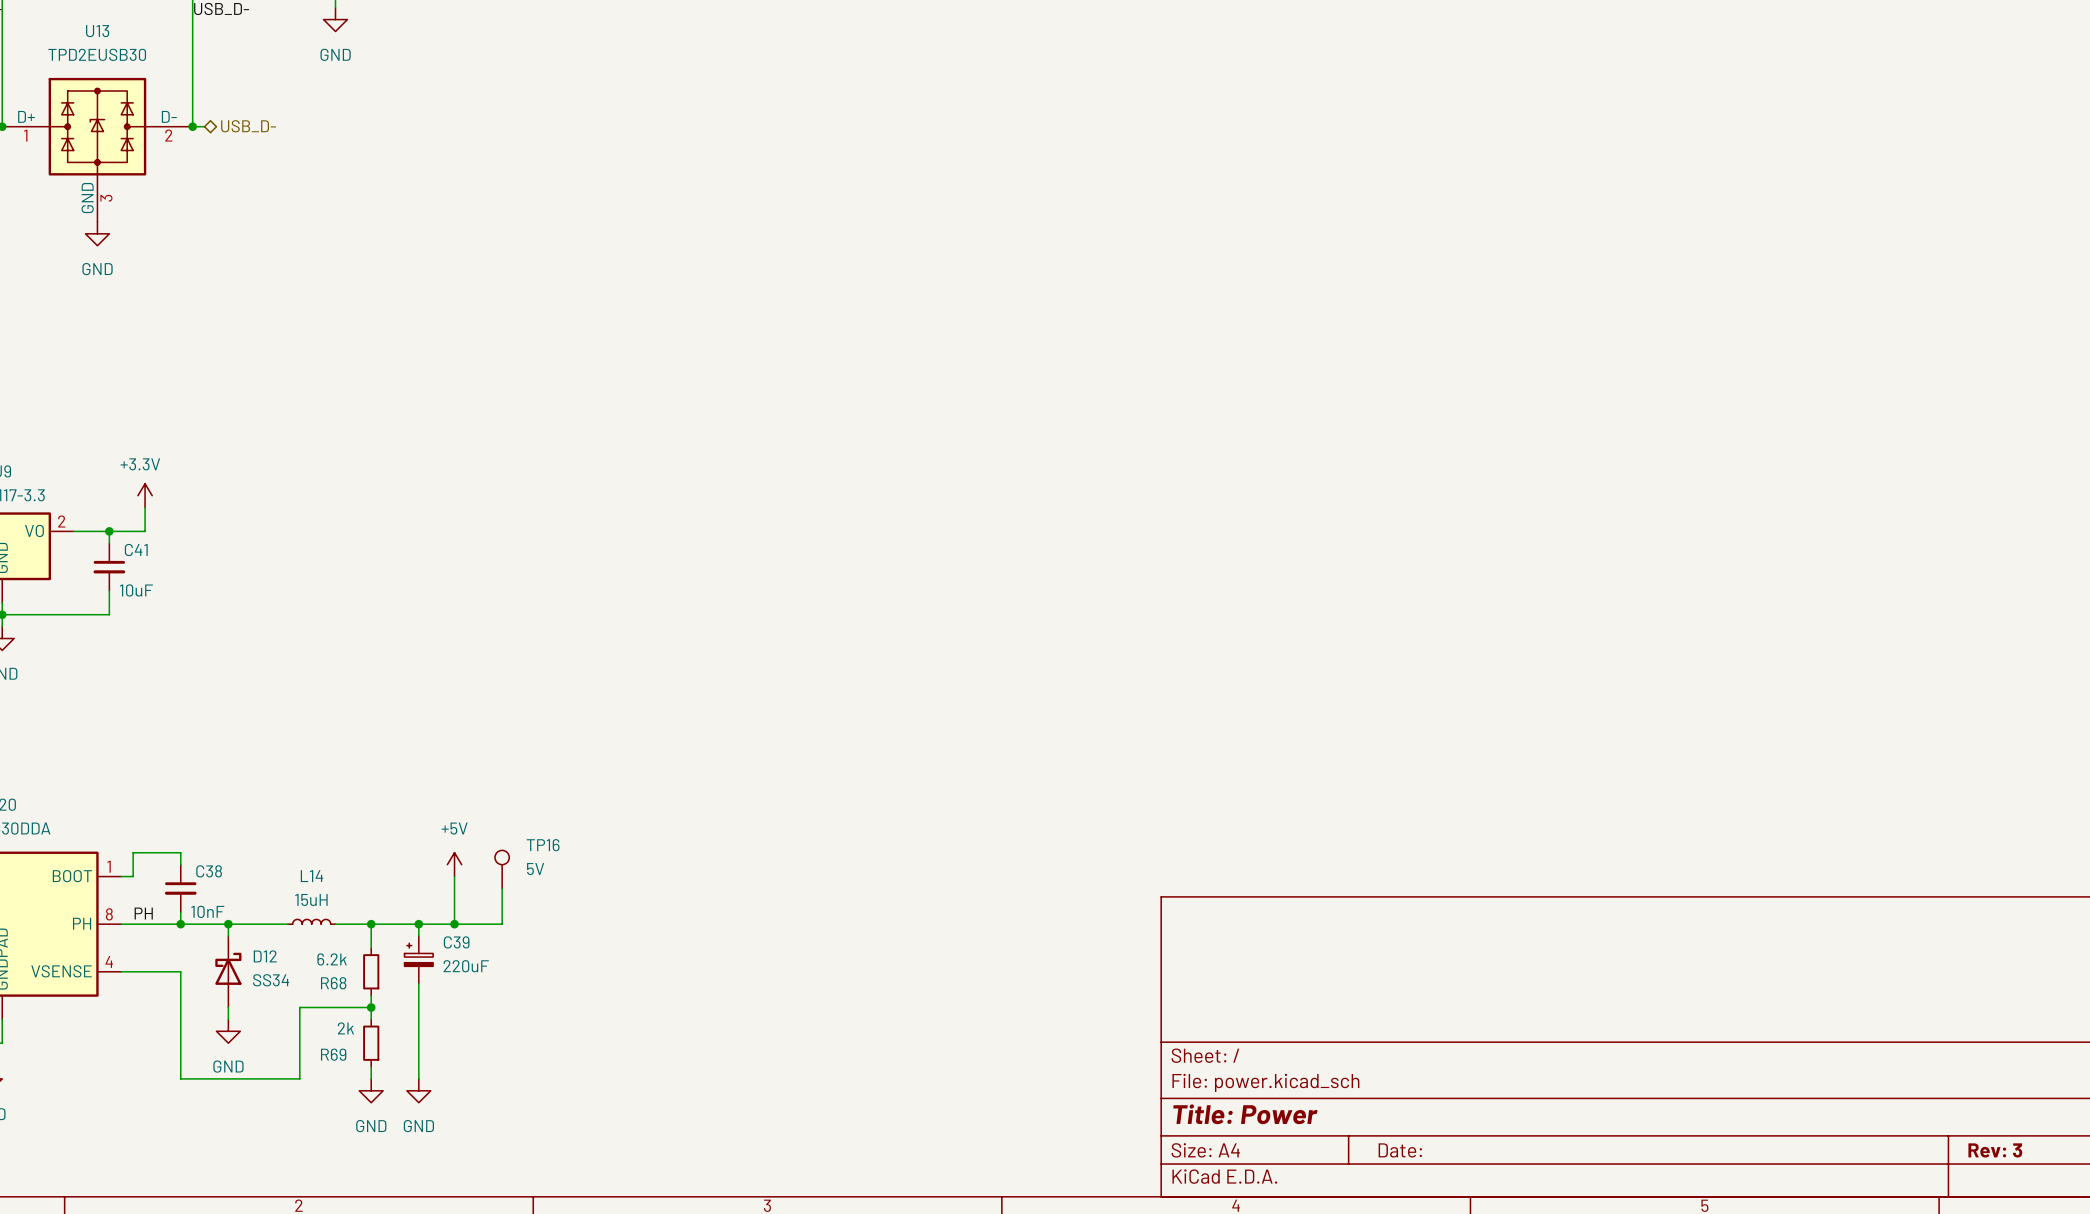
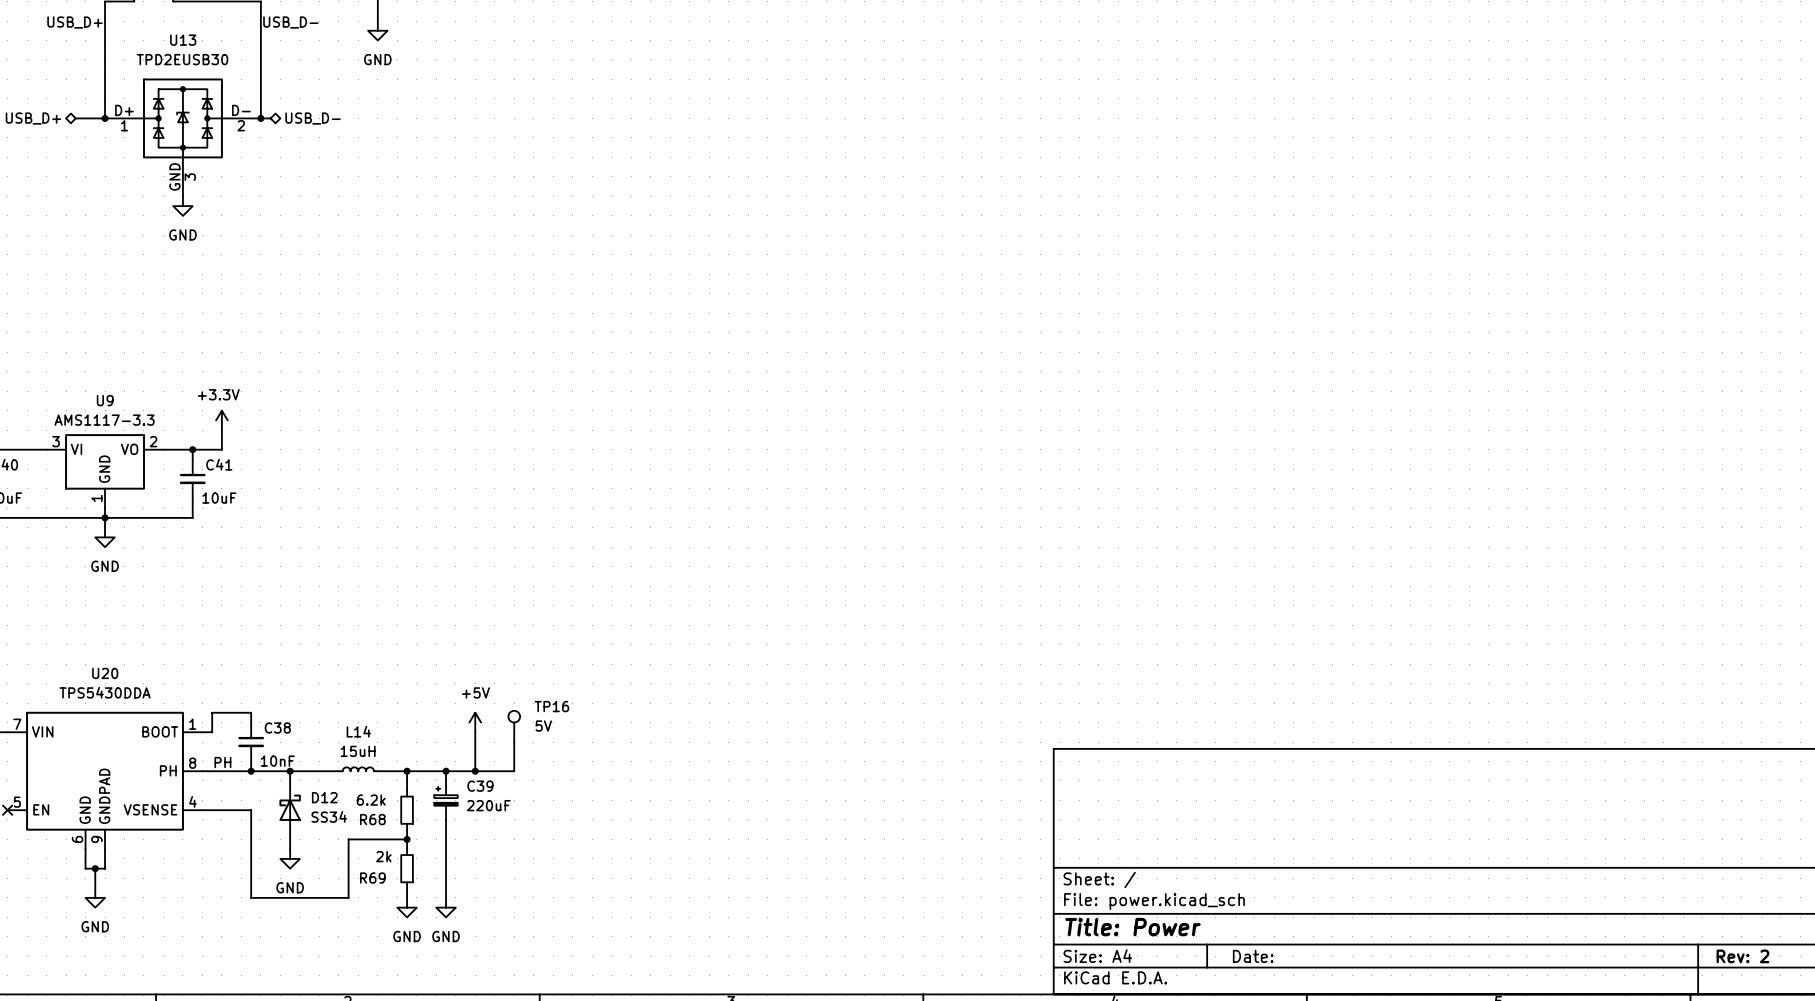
title block: Rev: 3 (1995, 1150) -> Rev: 2 (1742, 956)

